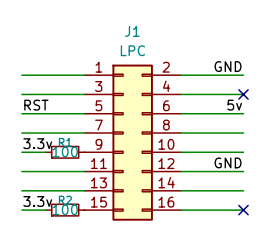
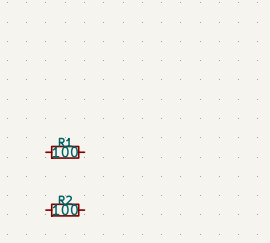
label: GND (228, 66) -> none
wire: (21, 75) (84, 75) -> none
wire: (180, 75) (243, 75) -> none
wire: (21, 94) (84, 94) -> none
wire: (180, 94) (243, 94) -> none
no-connect mark: (243, 94) -> none
label: RST (36, 105) -> none
label: 5v (234, 105) -> none
wire: (21, 113) (84, 113) -> none
wire: (180, 113) (243, 113) -> none
wire: (21, 133) (84, 133) -> none
wire: (180, 133) (243, 133) -> none
J1: LPC (132, 142) -> none
label: 3.3v (37, 143) -> none
wire: (21, 152) (45, 152) -> none
wire: (180, 152) (243, 152) -> none
label: GND (228, 162) -> none
wire: (21, 171) (84, 171) -> none
wire: (180, 171) (243, 171) -> none
wire: (21, 190) (84, 190) -> none
wire: (180, 190) (243, 190) -> none
label: 3.3v (37, 201) -> none
wire: (21, 210) (45, 210) -> none
wire: (180, 210) (243, 210) -> none
no-connect mark: (243, 210) -> none

